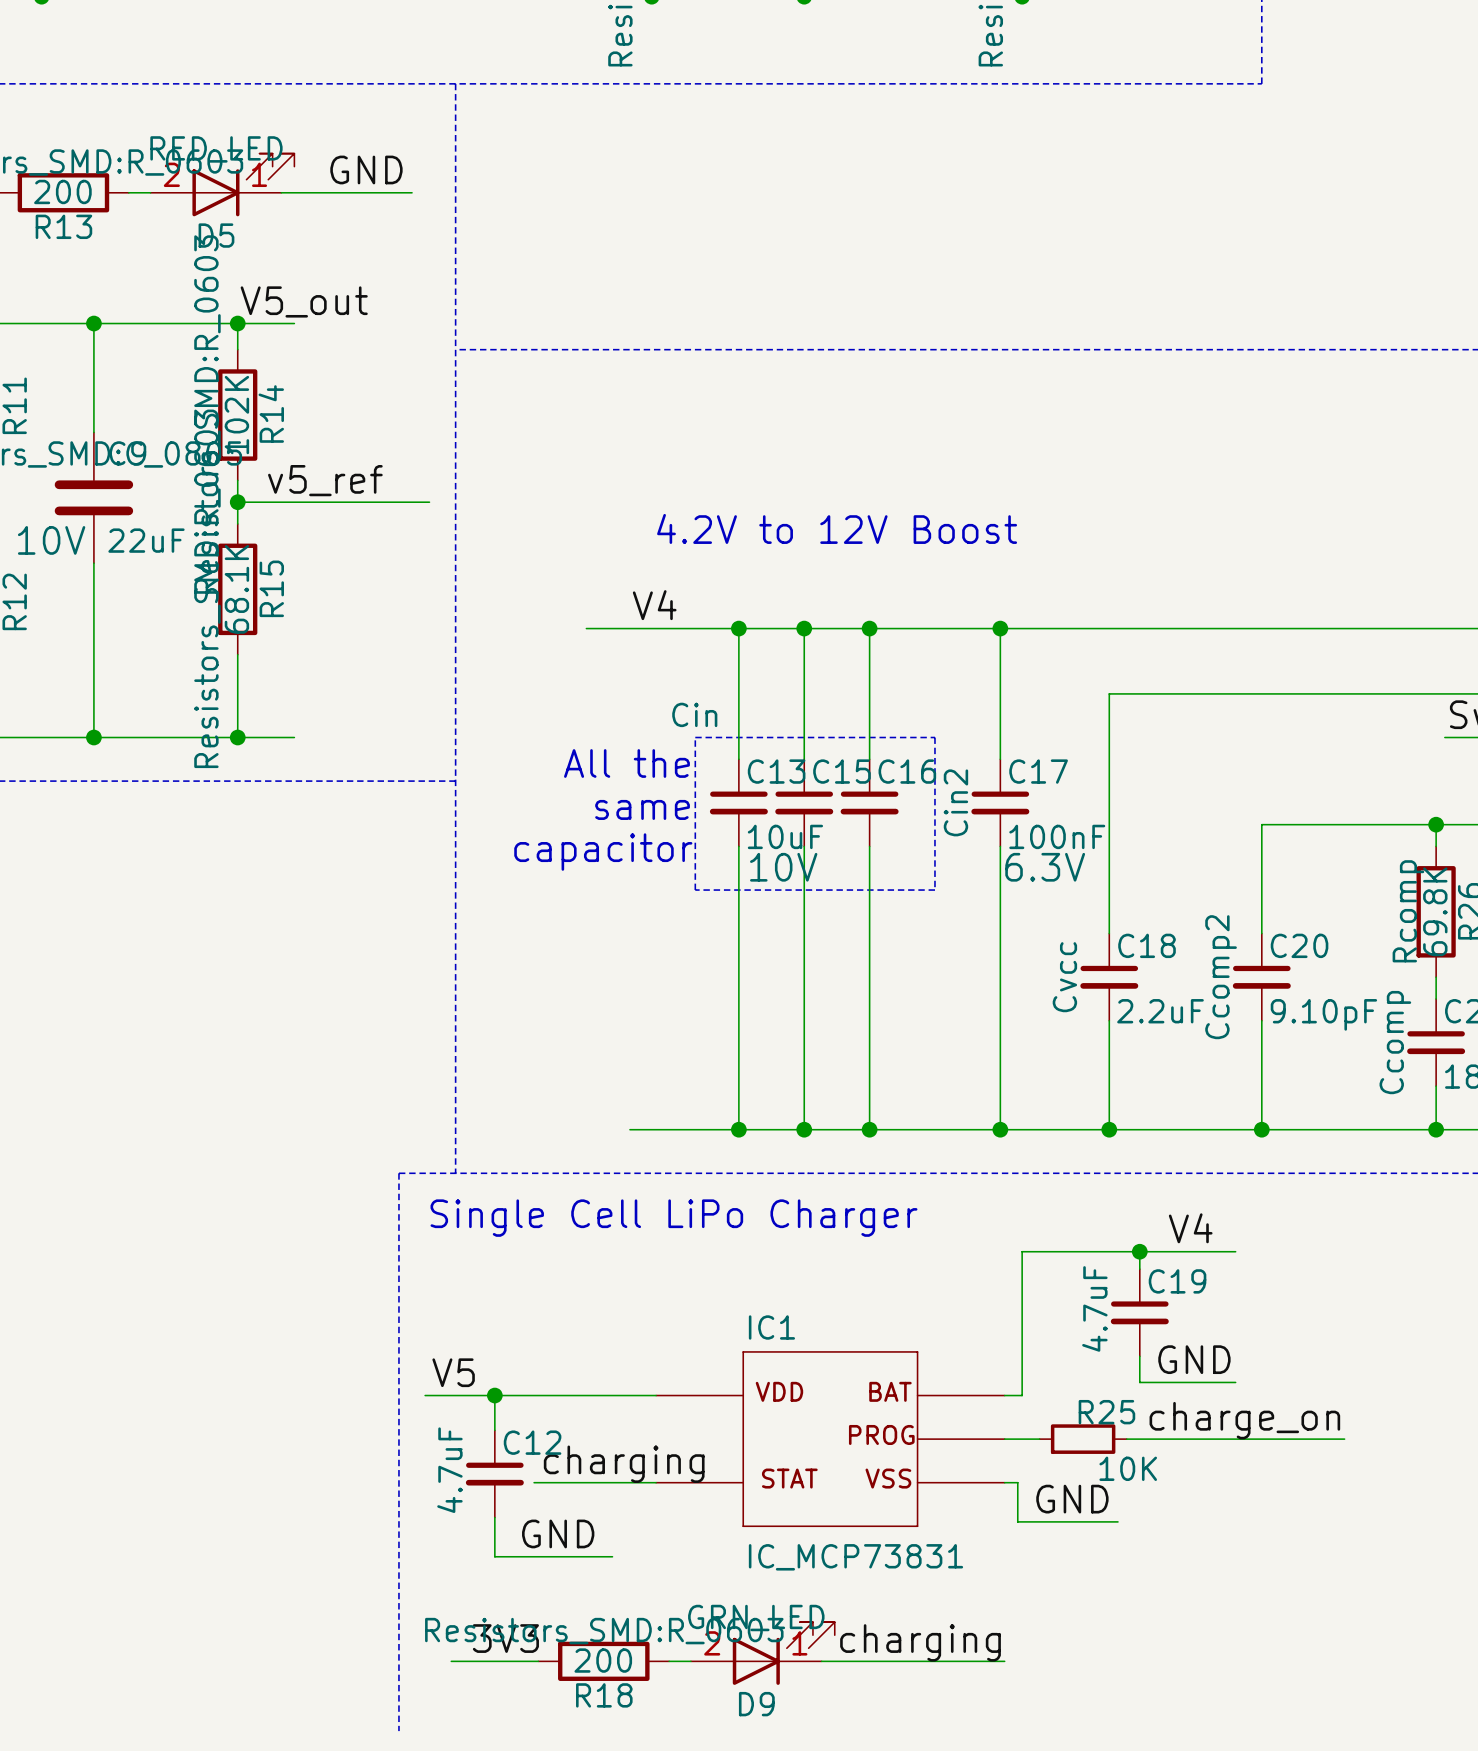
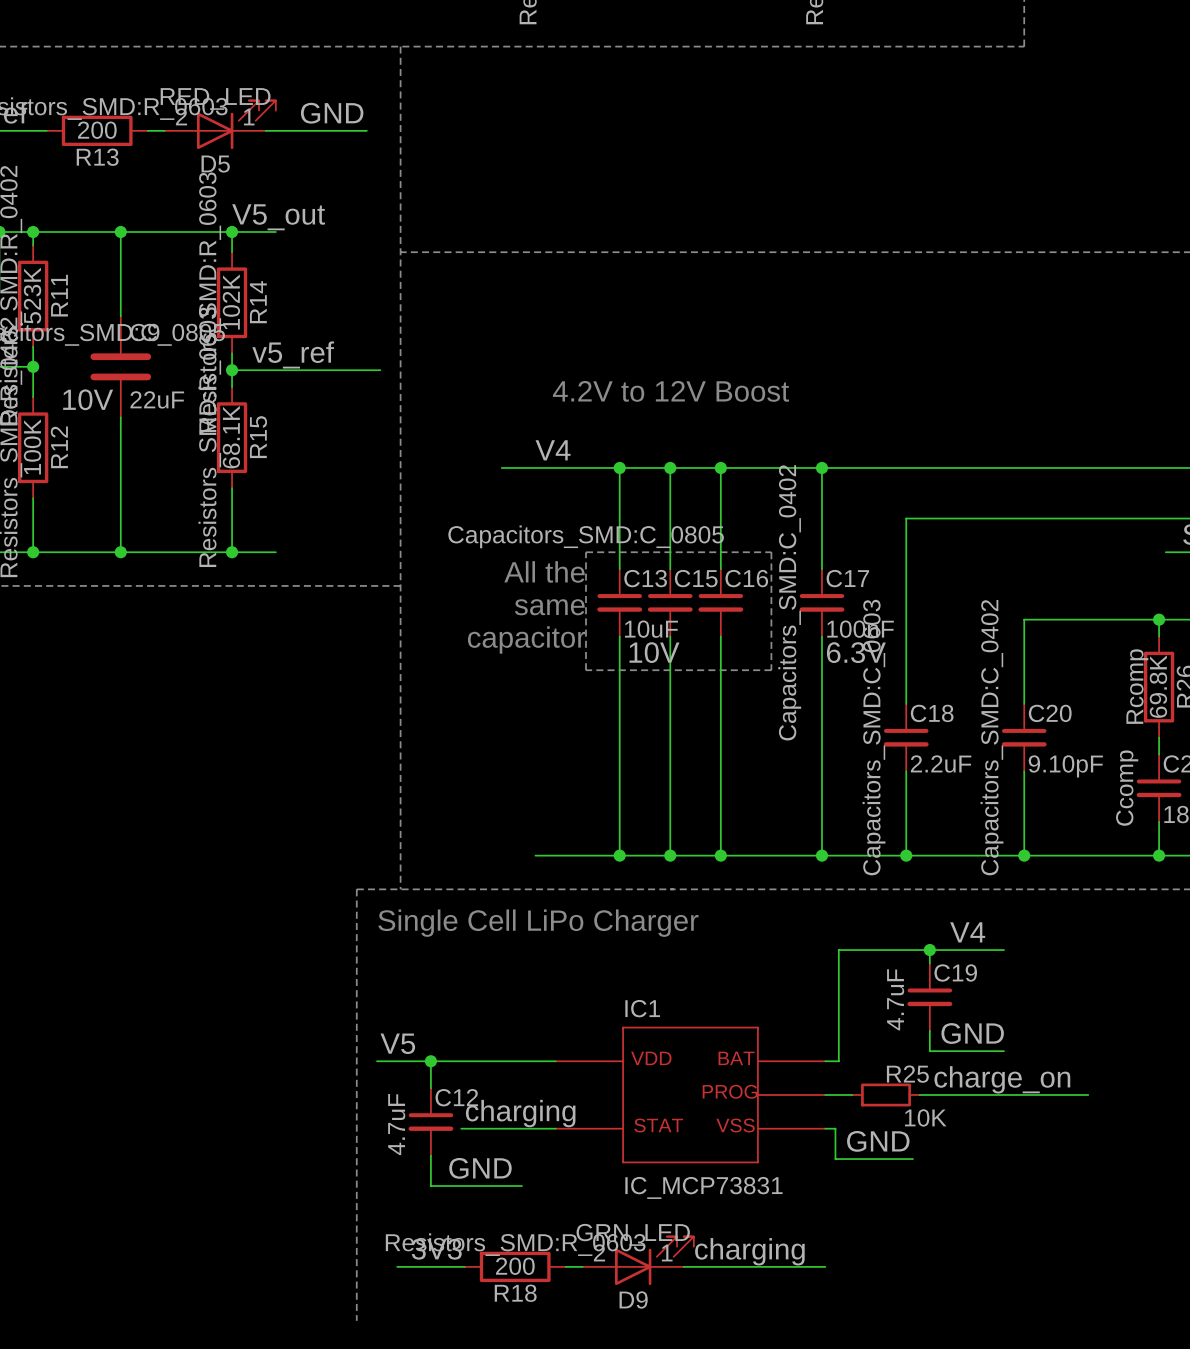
C13 text: Cin (694, 714) -> Capacitors_SMD:C_0805 (586, 536)
C17 text: Cin2 (955, 802) -> Capacitors_SMD:C_0402 (789, 602)
C18 text: Cvcc (1064, 977) -> Capacitors_SMD:C_0603 (874, 737)
C20 text: Ccomp2 (1221, 977) -> Capacitors_SMD:C_0402 (991, 737)

